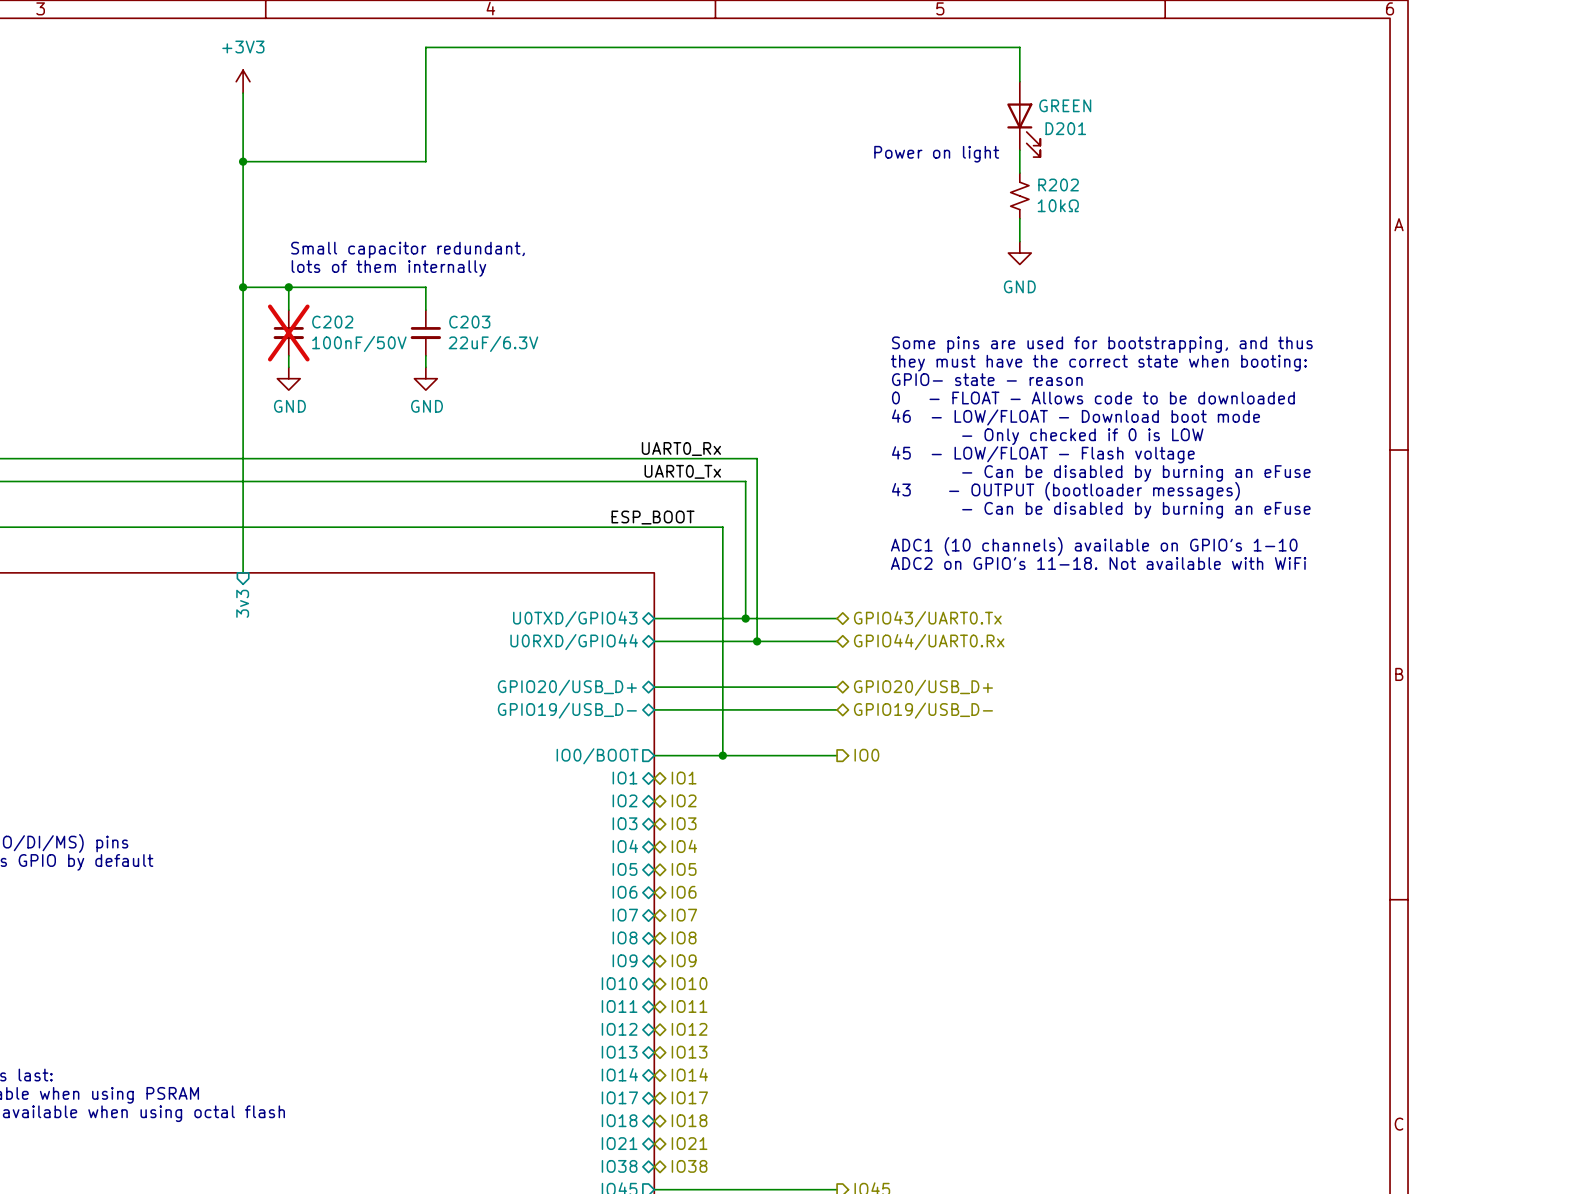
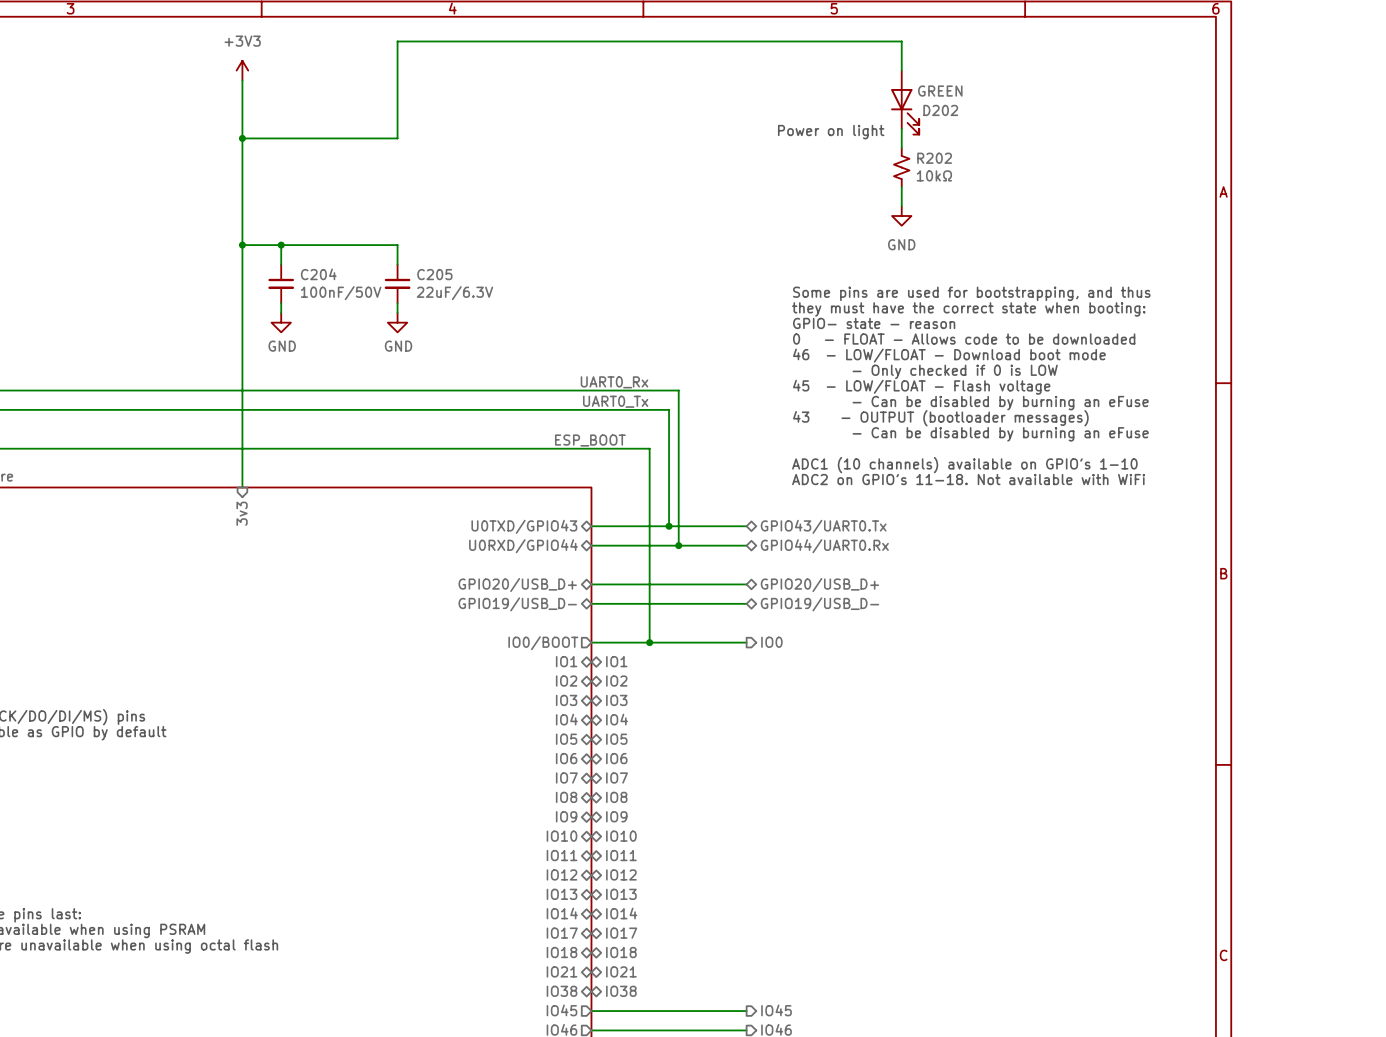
D201 name: D201 (1065, 128) -> D202 (940, 110)
text: Small capacitor redundant, (407, 250) -> none
text: lots of them internally (388, 268) -> none
C202 name: C202 (332, 322) -> C204 (318, 274)
C203 name: C203 (469, 322) -> C205 (434, 274)
C202 do-not-place cross: (288, 333) -> none

